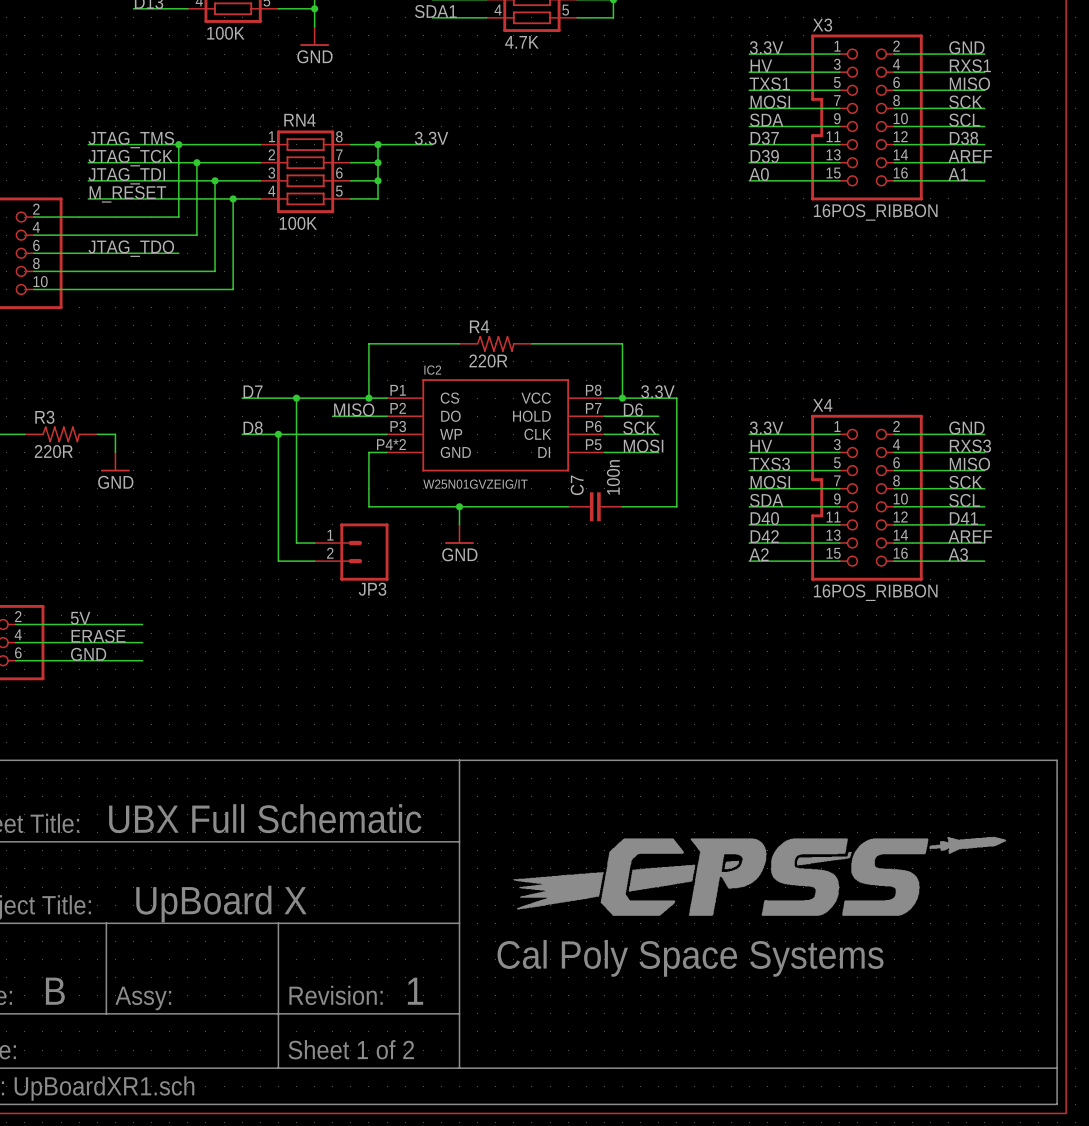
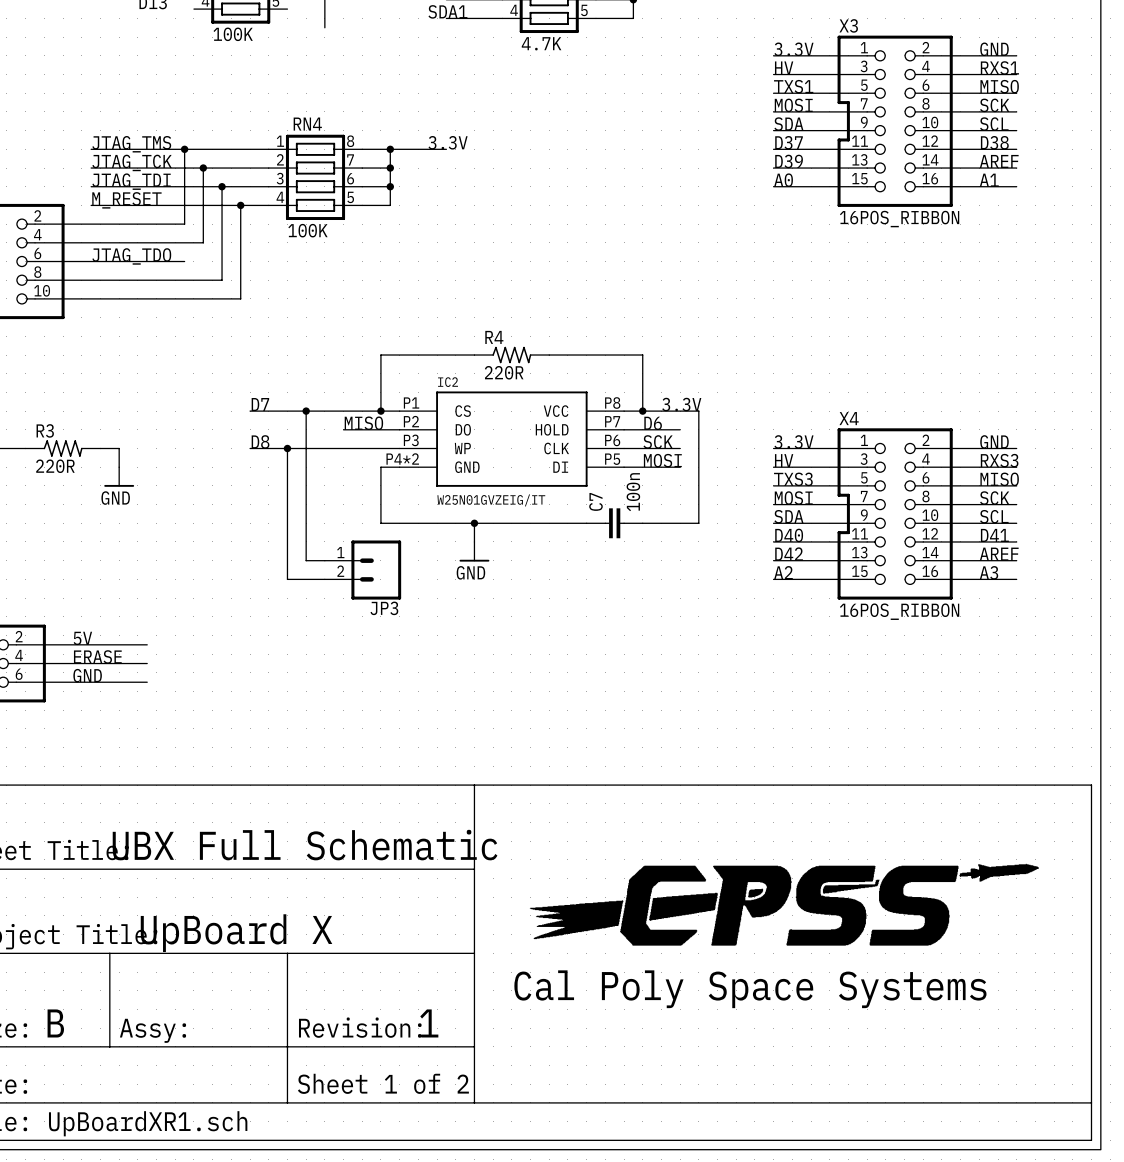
wire: (133, 8) (187, 8) -> none
wire: (278, 8) (314, 8) -> none
junction: (314, 8) -> none
power symbol: GND (314, 36) -> none

